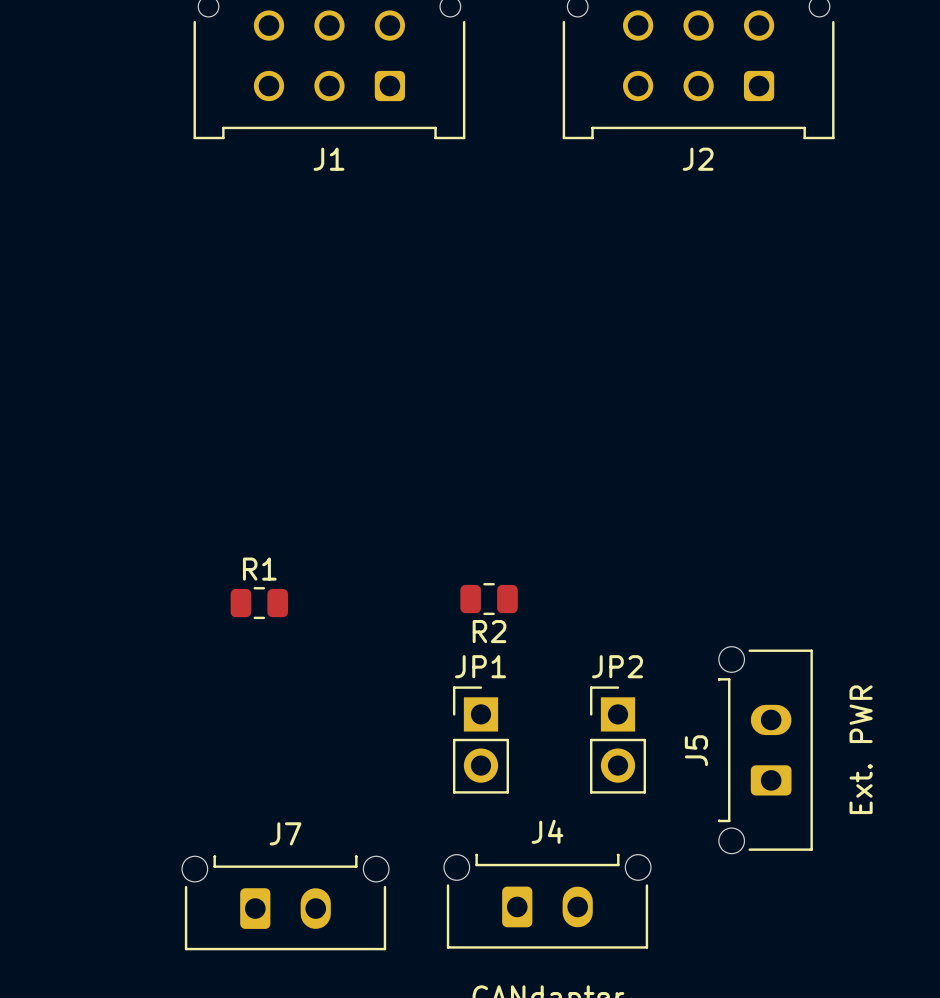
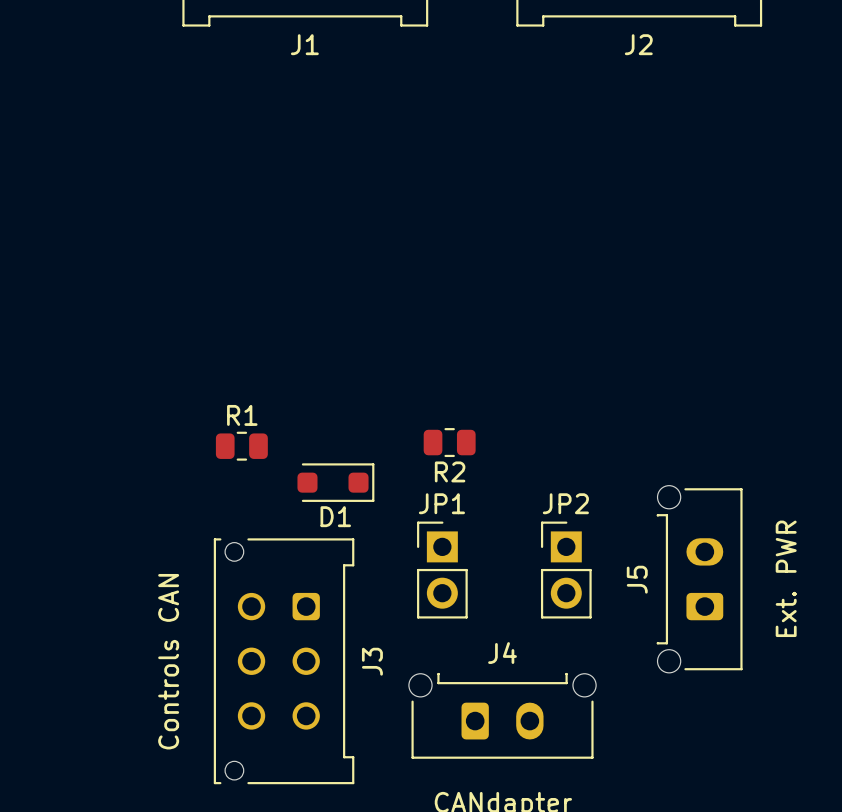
D1: none -> (335, 482)
J3: none -> Controls CAN (284, 661)
J7: (285, 902) -> none

